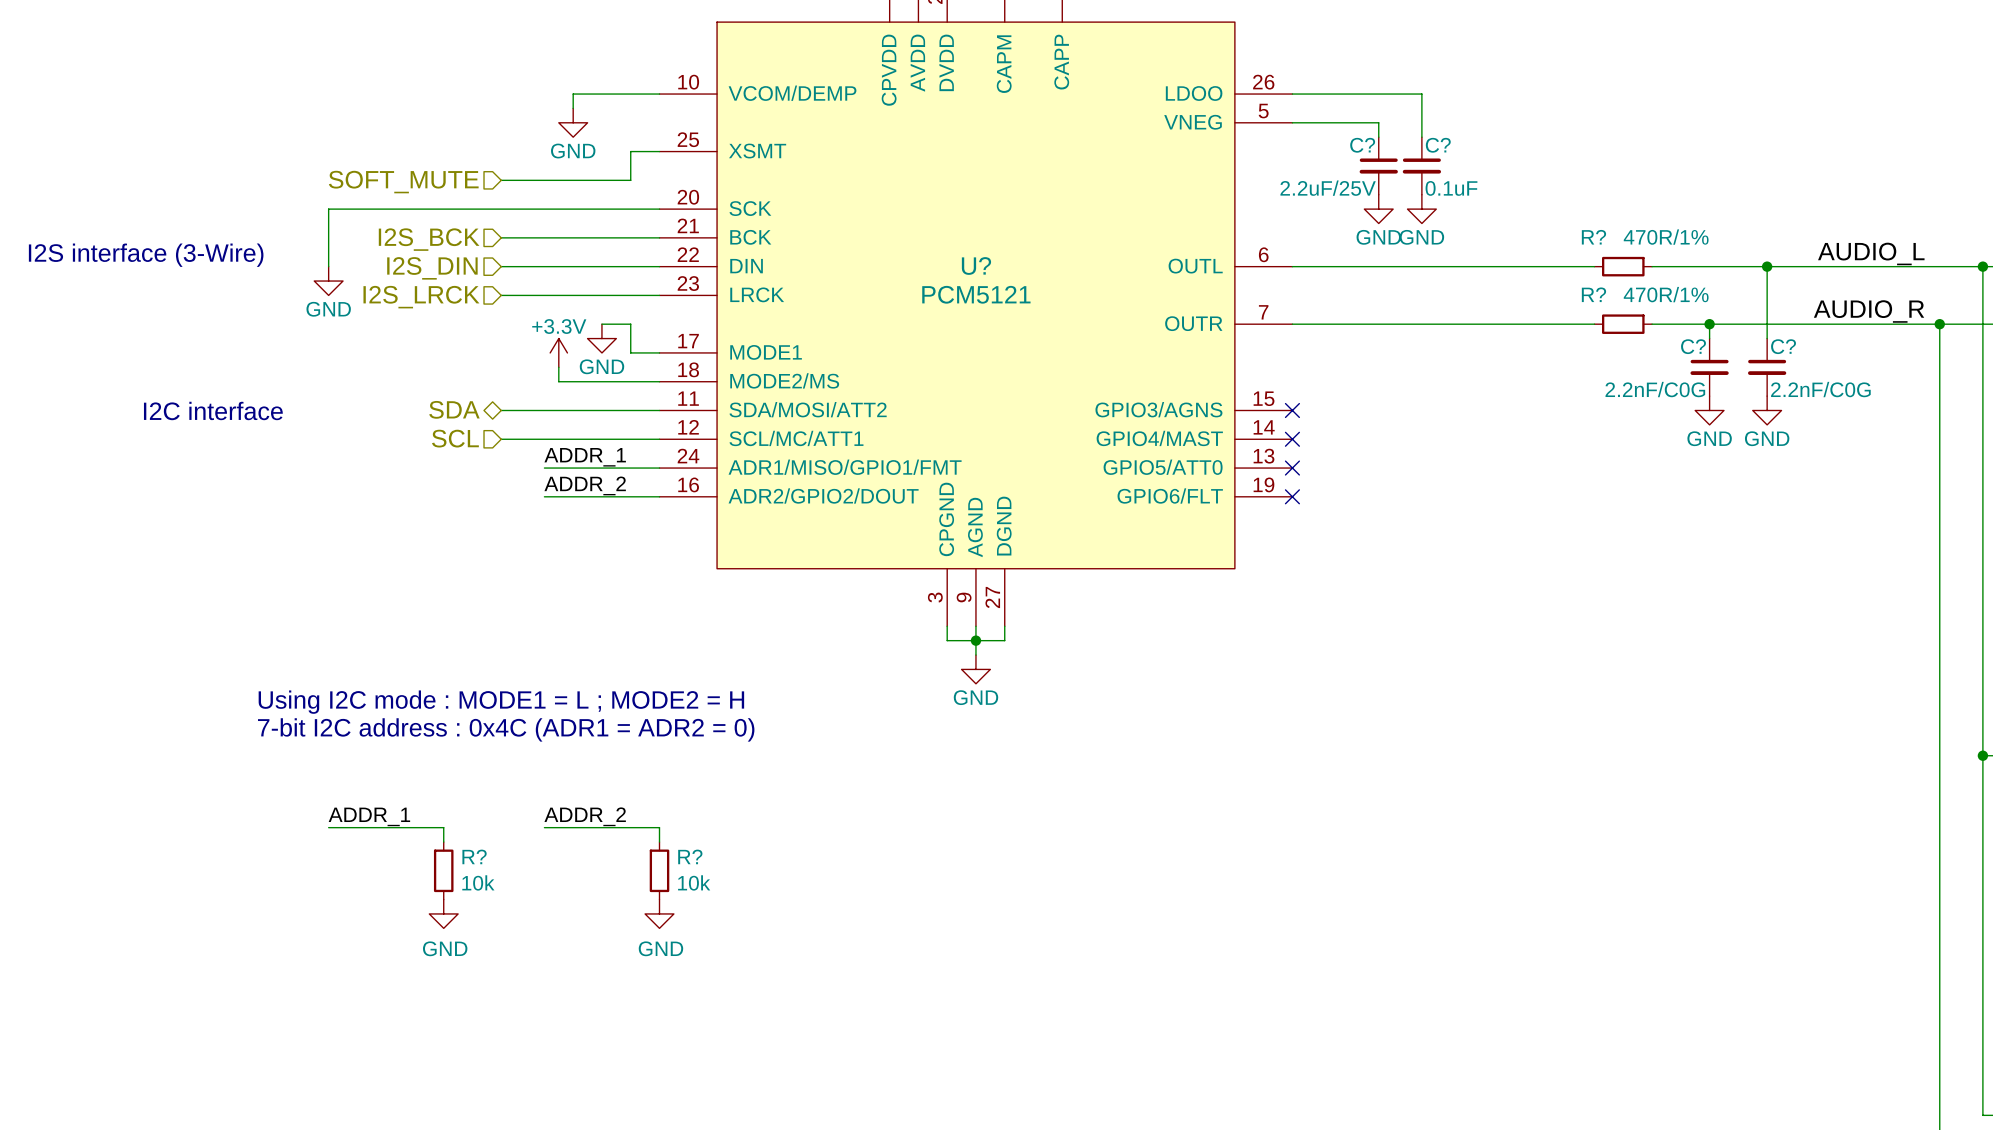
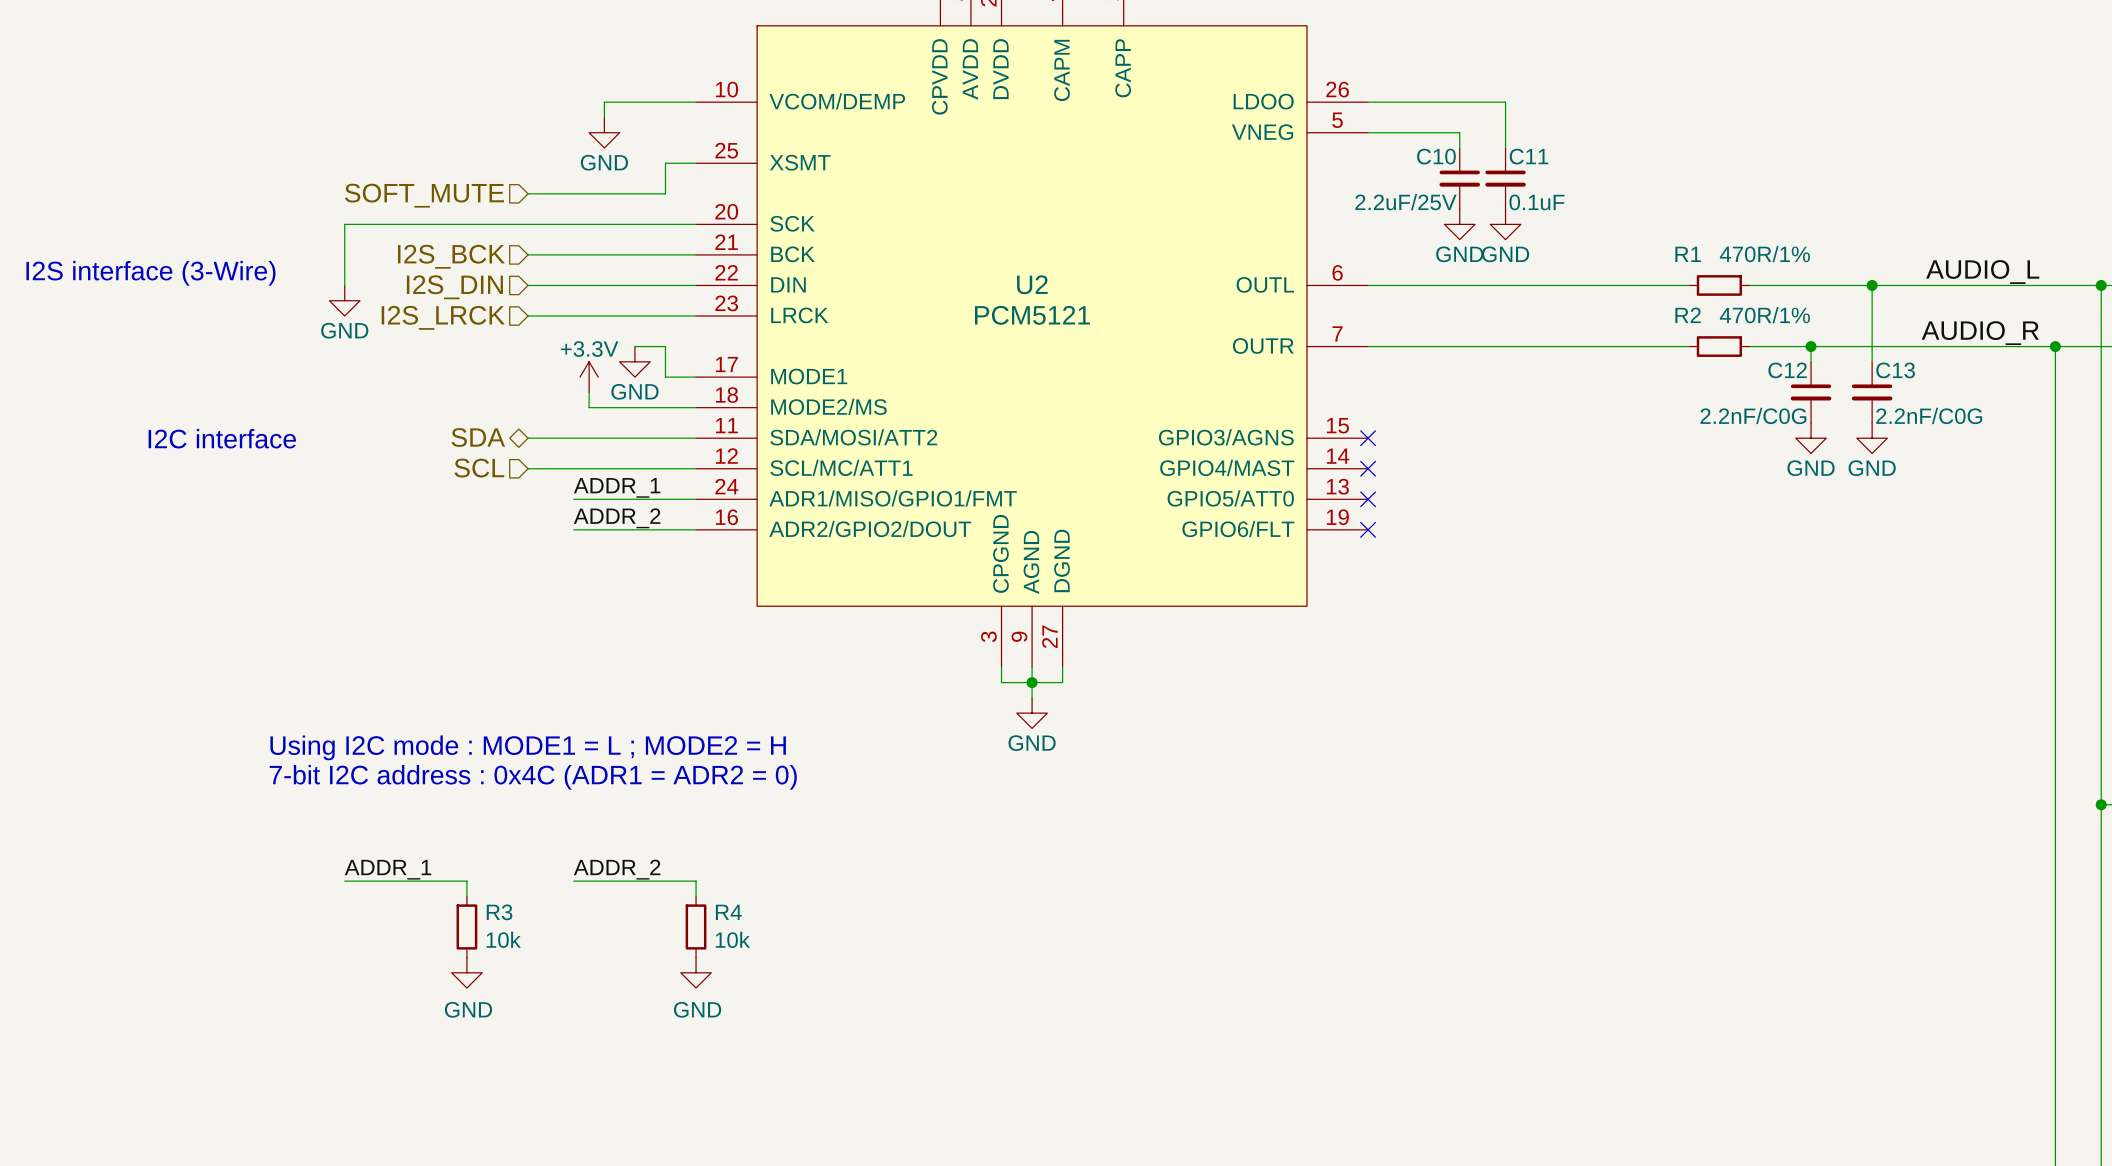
C? name: C? (1362, 145) -> C10 (1436, 156)
C? name: C? (1438, 145) -> C11 (1528, 156)
R? name: R? (1593, 237) -> R1 (1688, 254)
U? name: U? (976, 265) -> U2 (1032, 284)
R? name: R? (1593, 294) -> R2 (1688, 315)
C? name: C? (1693, 346) -> C12 (1787, 370)
C? name: C? (1783, 346) -> C13 (1895, 370)
R? name: R? (474, 856) -> R3 (499, 912)
R? name: R? (690, 856) -> R4 (728, 912)

